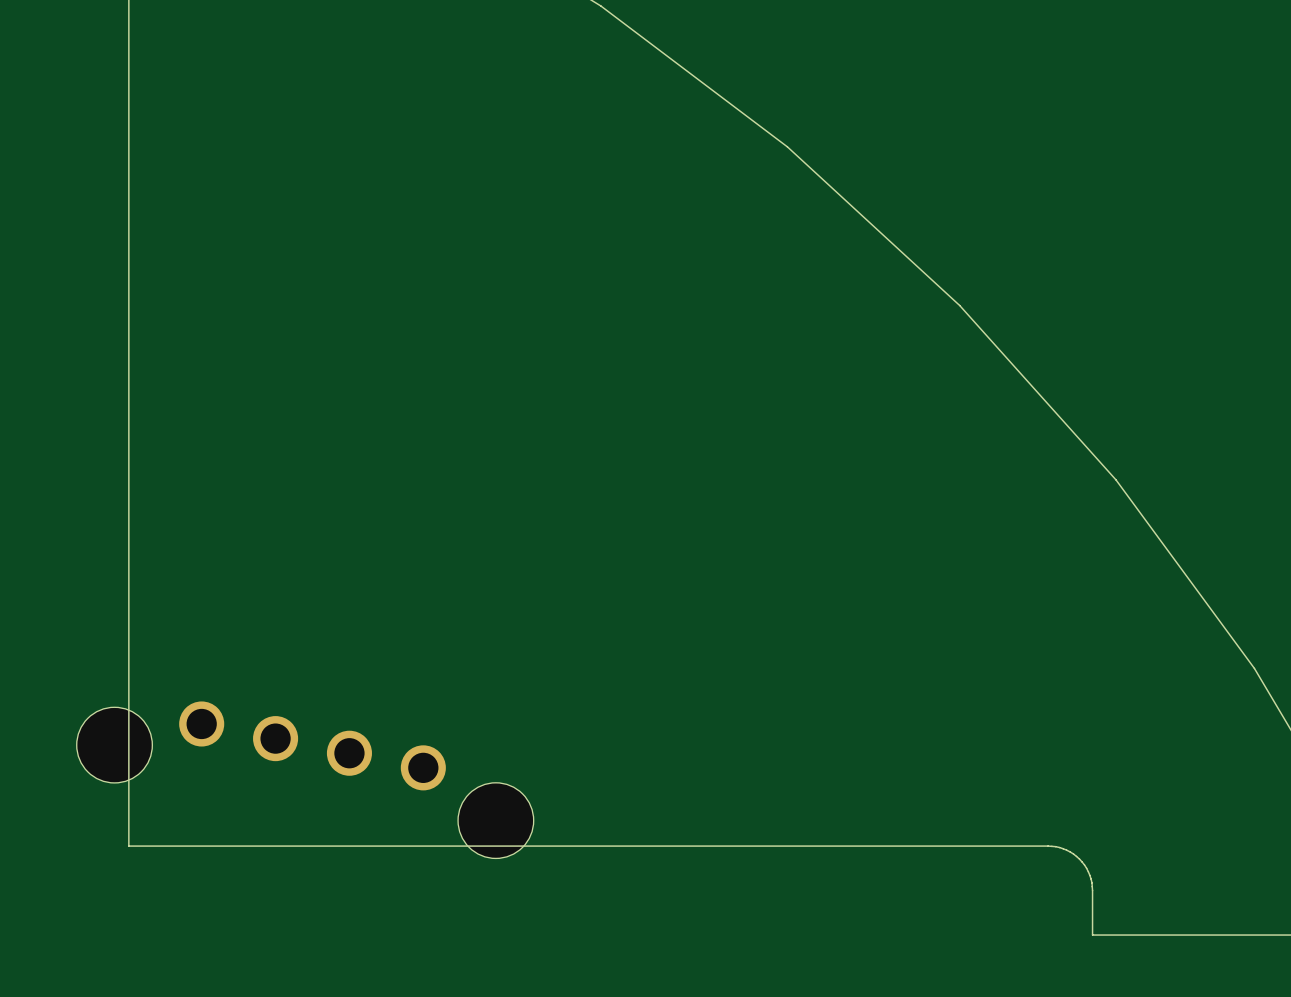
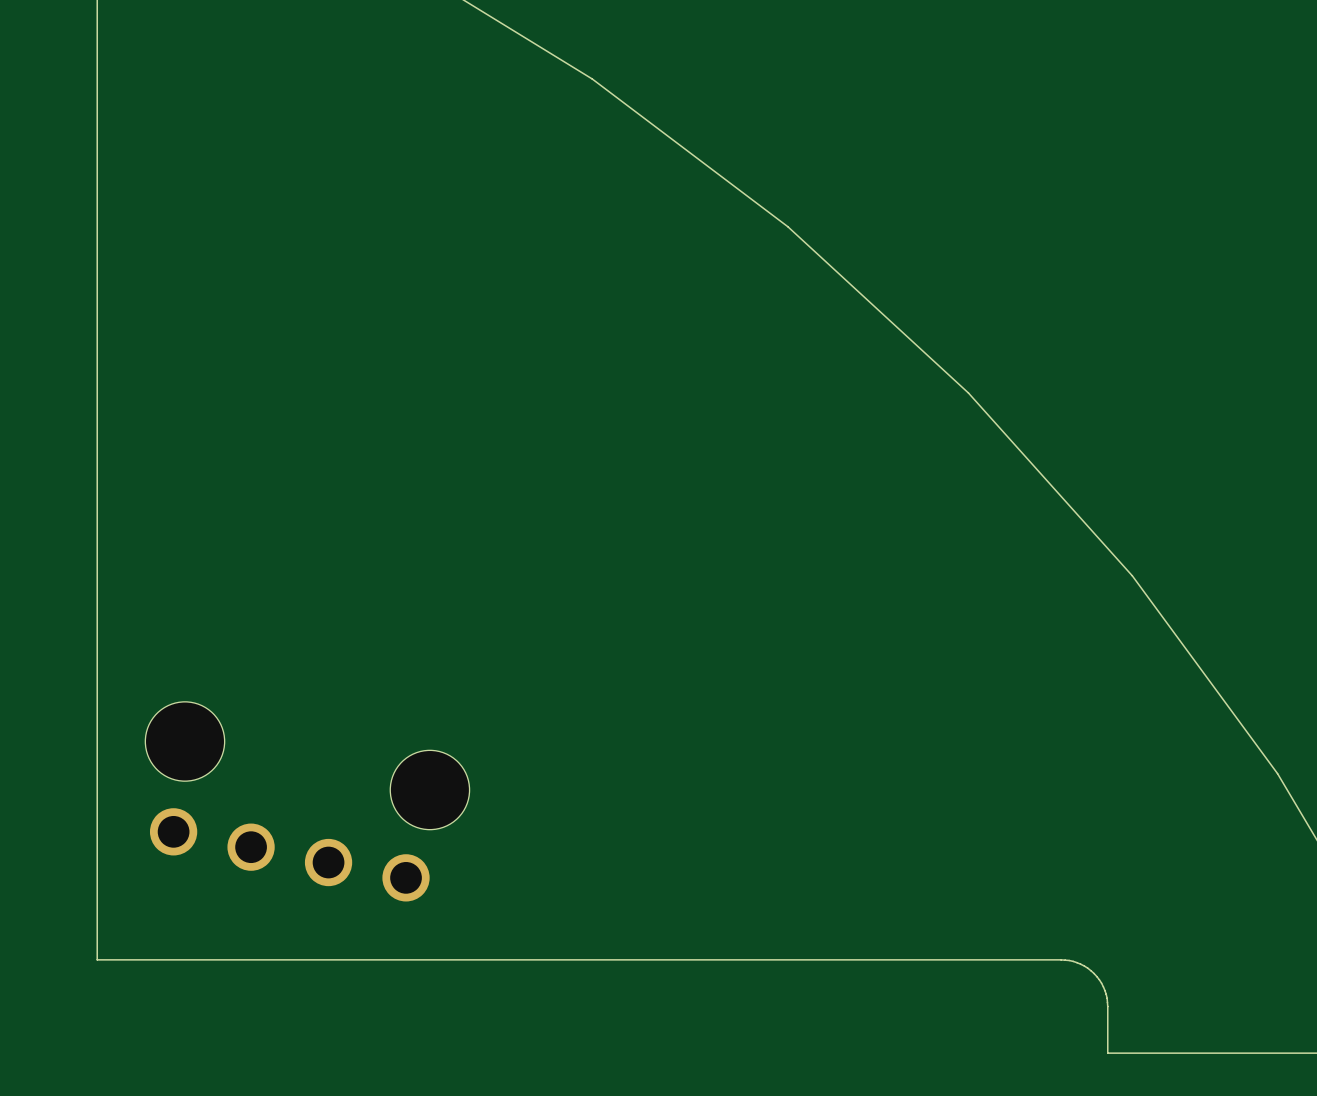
part: none -> (307, 801)
part: (305, 779) -> none

